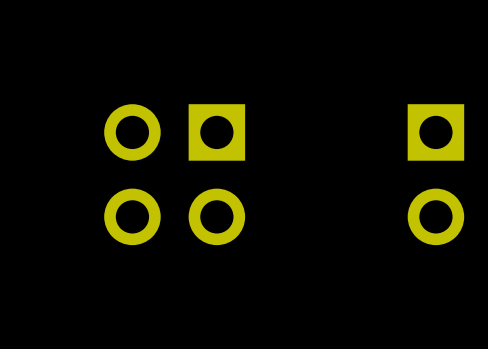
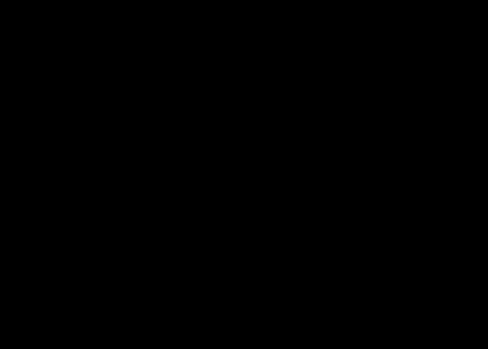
part: (174, 174) -> none
part: (435, 174) -> none

